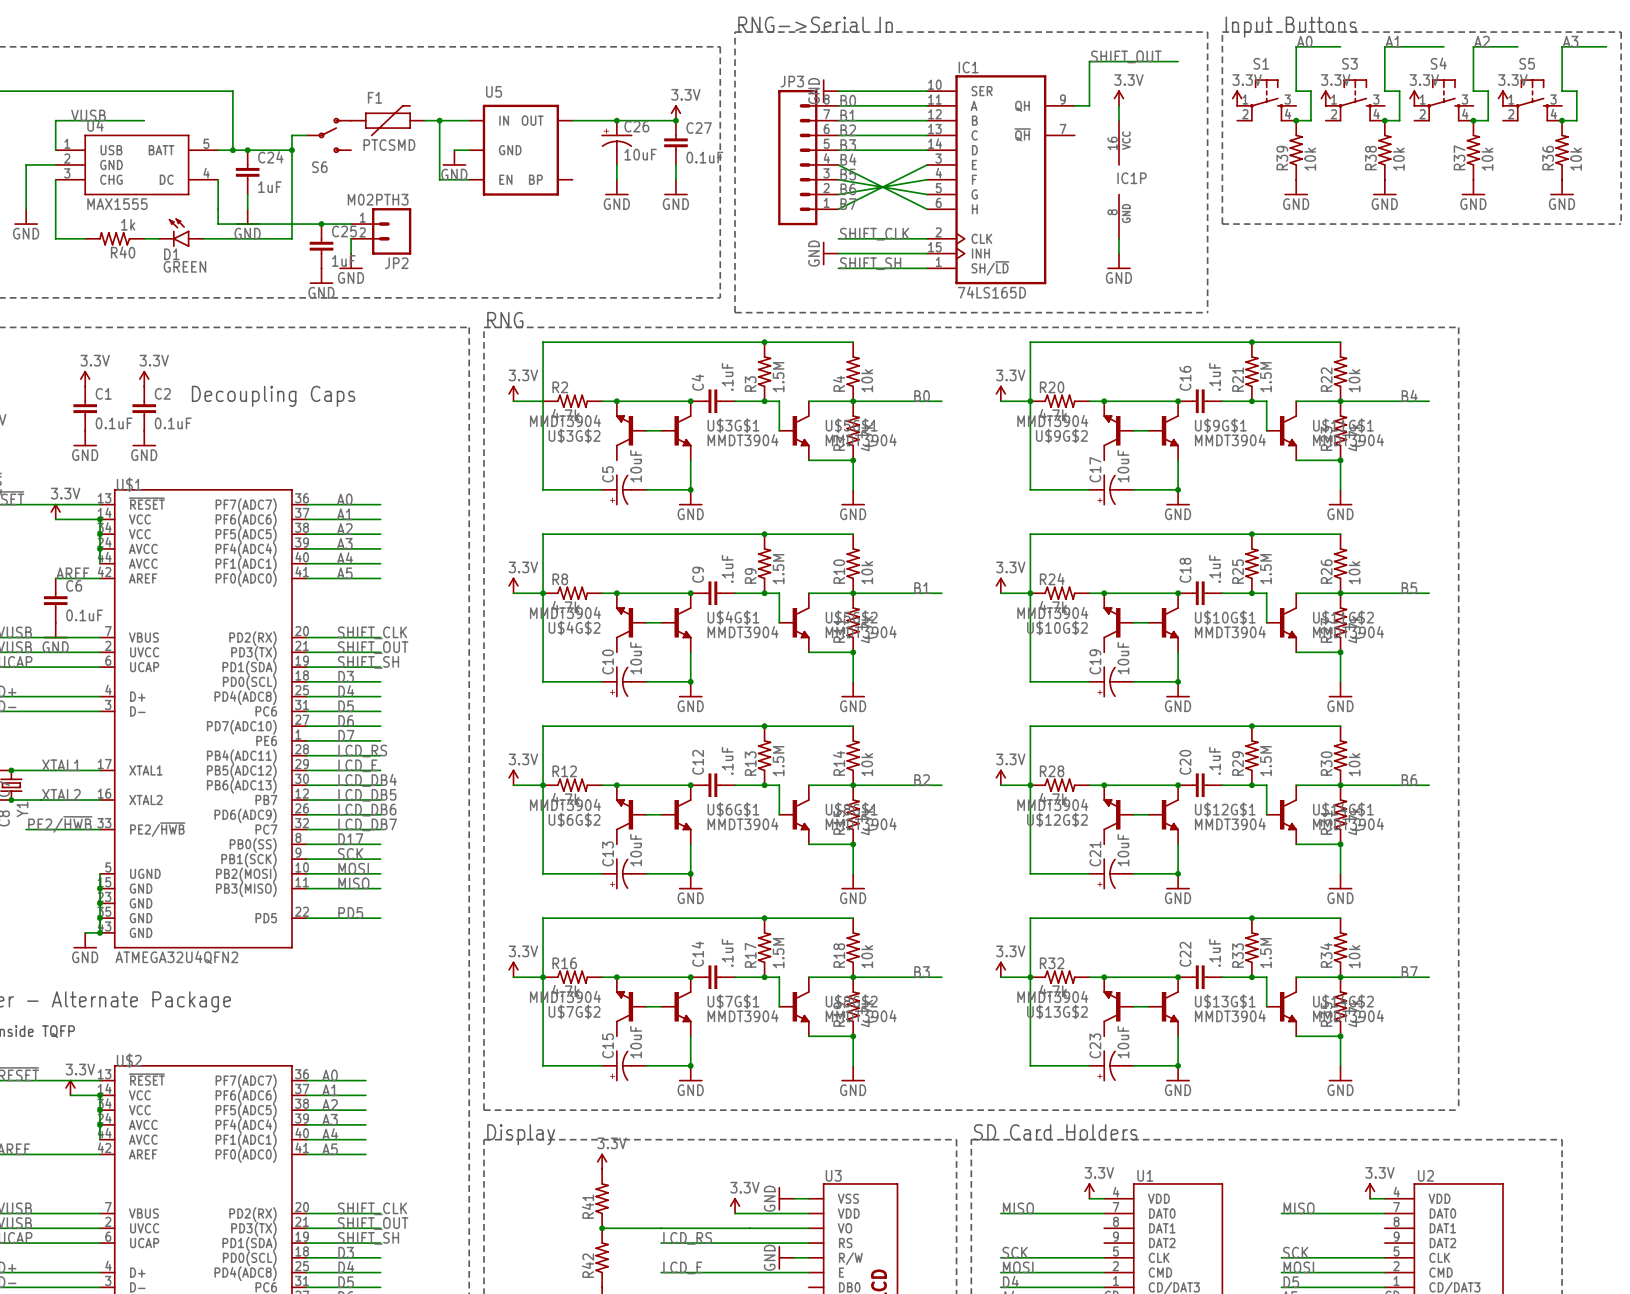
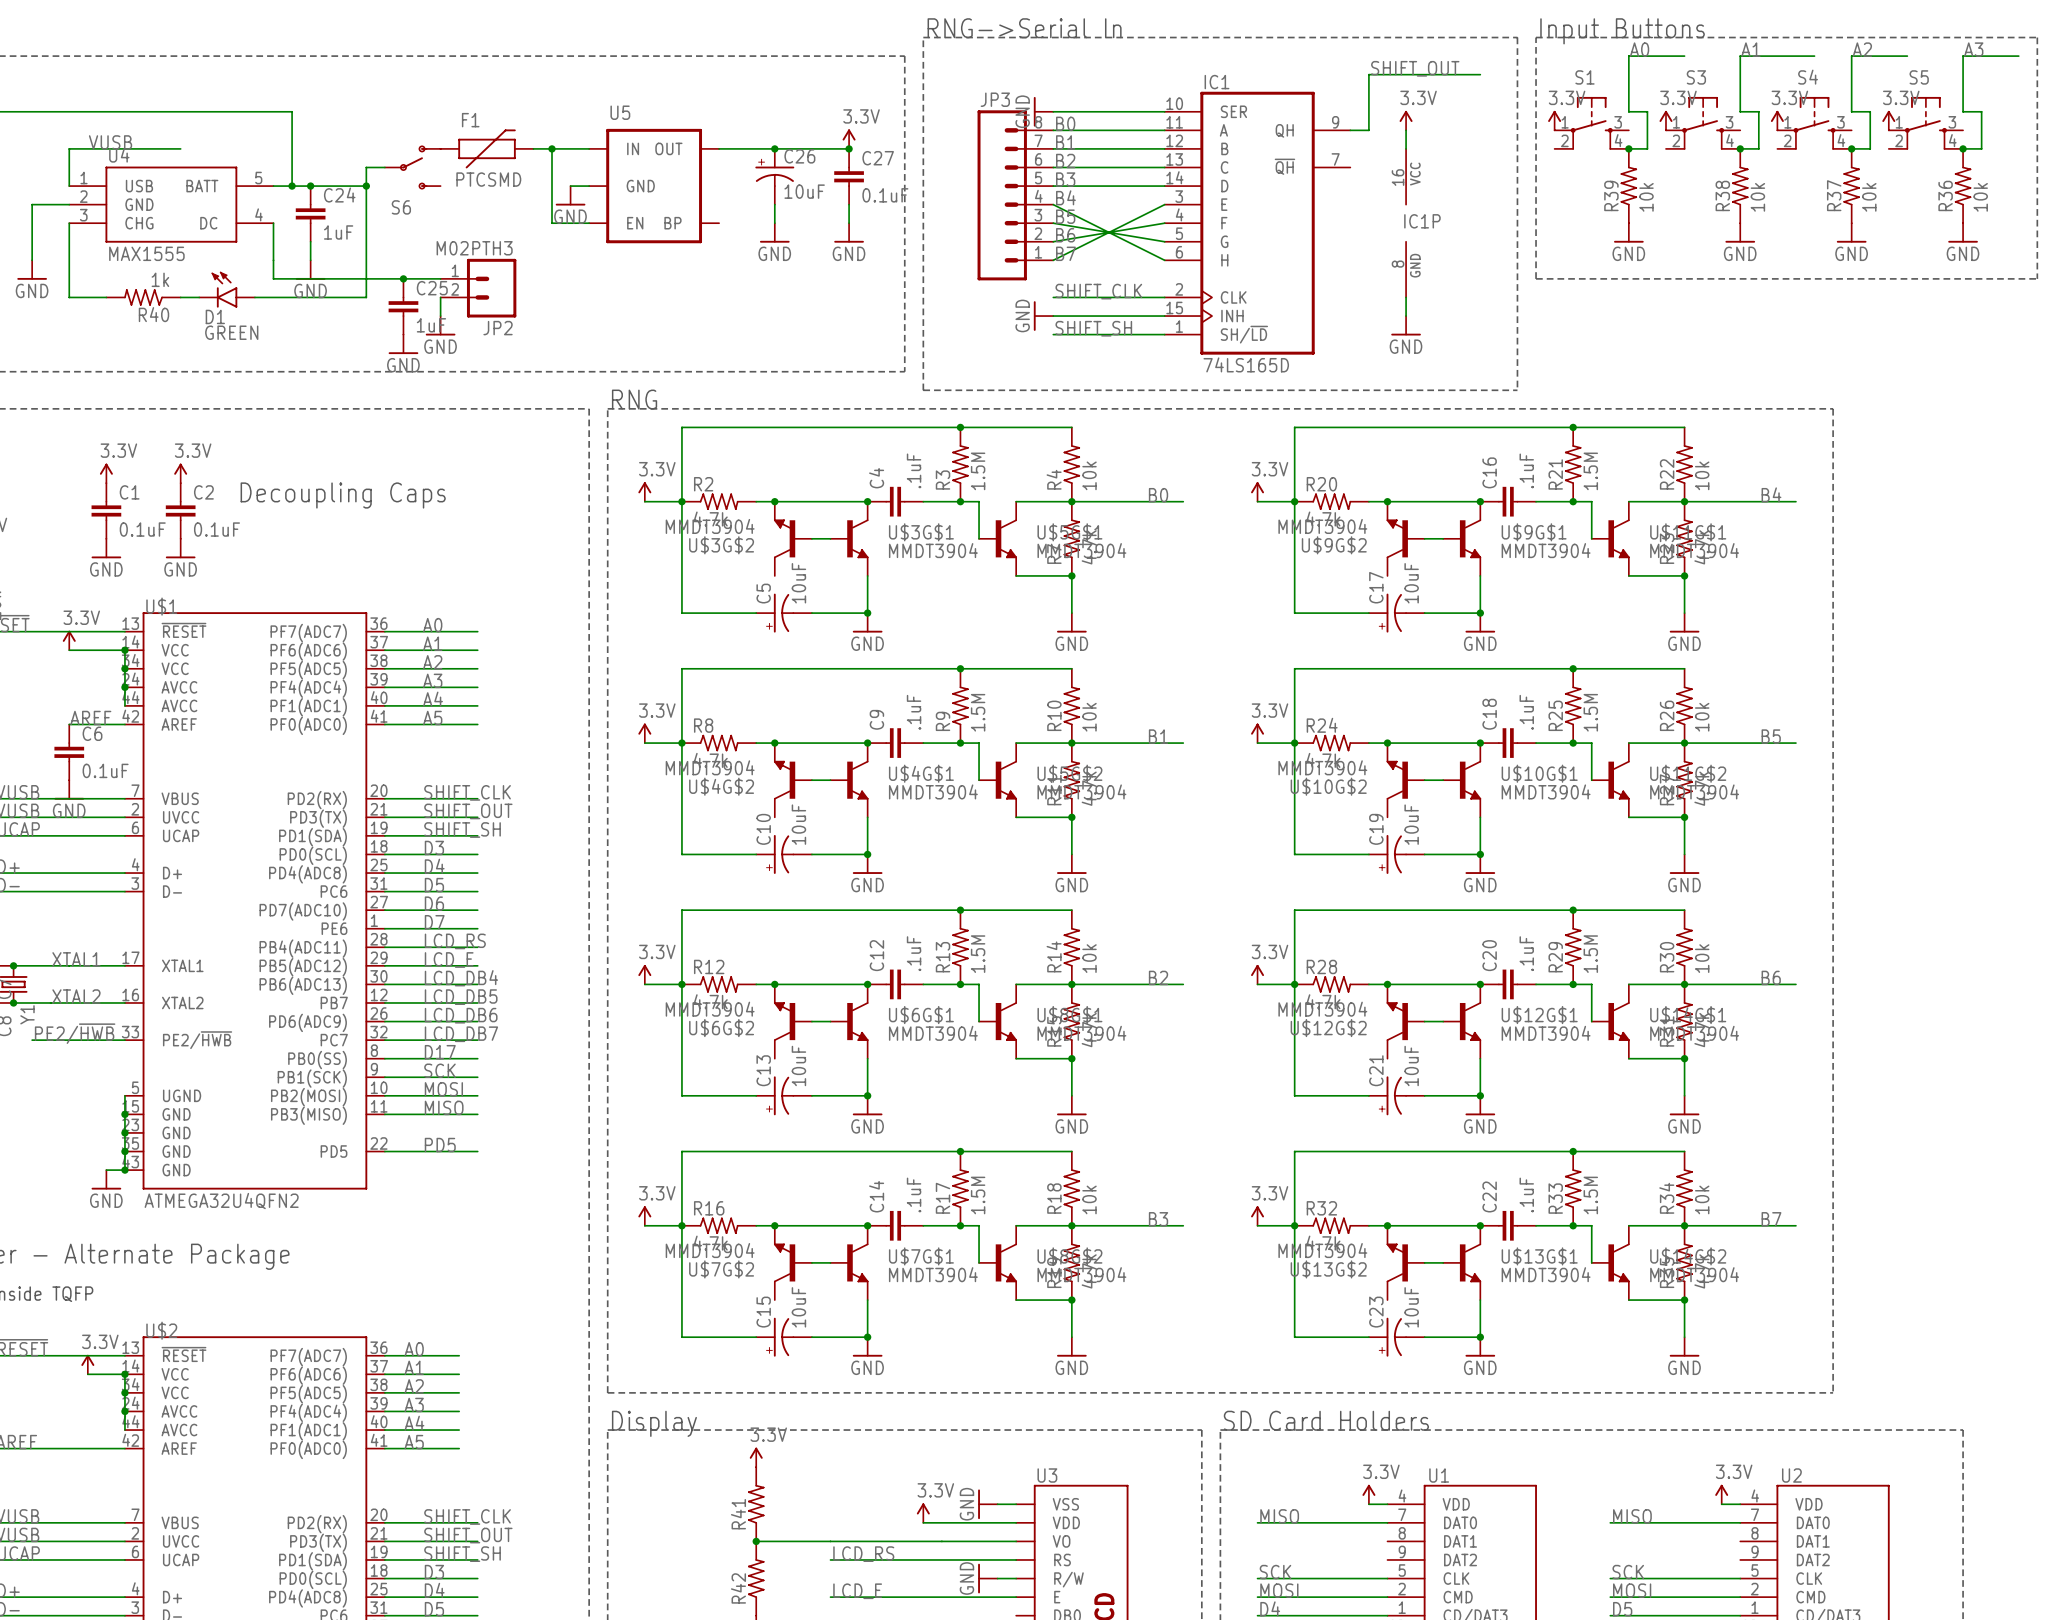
junction: none -> (681, 501)

